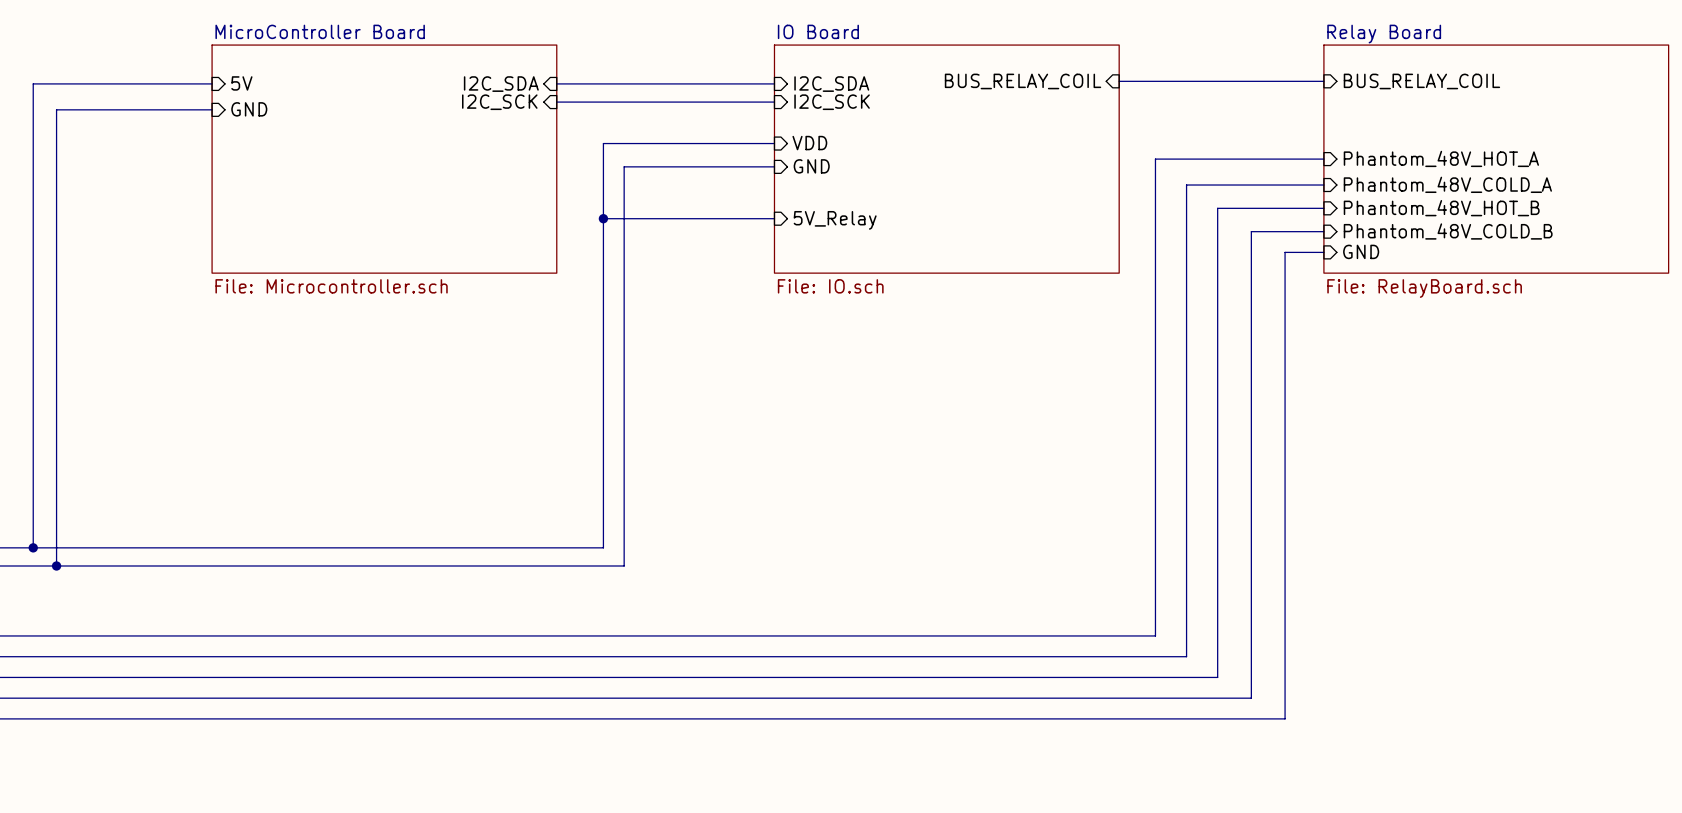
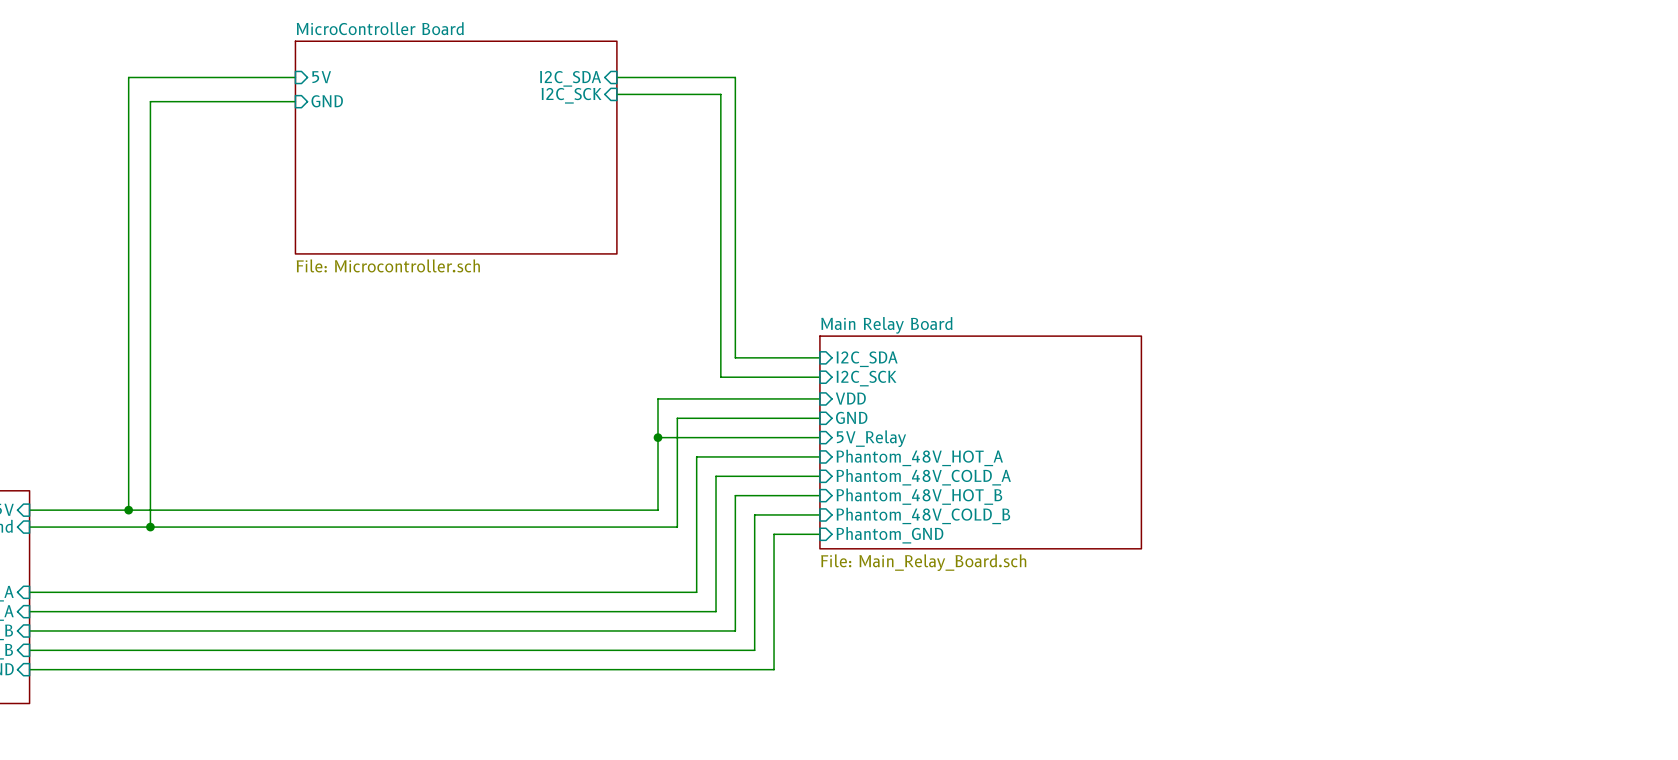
sheet pin: BUS_RELAY_COIL (1023, 81) -> none
bus: (1119, 81) (1323, 81) -> none
sheet pin: BUS_RELAY_COIL (1421, 81) -> none
wire: (683, 83) (774, 83) -> (735, 77) (735, 357) (819, 357)
sheet pin: I2C_SDA (831, 84) -> none
wire: (668, 102) (774, 102) -> (720, 94) (720, 377) (819, 377)
sheet pin: I2C_SCK (832, 102) -> none
wire: (774, 143) (603, 143) (603, 547) (600, 547) -> (819, 398) (658, 398) (658, 510)
sheet pin: VDD (809, 143) -> none
sheet pin: Phantom_48V_HOT_A (1441, 158) -> none
sheet IO Board: File: IO.sch (946, 159) -> none
wire: (1323, 159) (1155, 159) (1155, 635) (642, 635) -> (819, 456) (696, 456) (696, 592)
sheet Relay Board: File: RelayBoard.sch (1496, 159) -> none
wire: (774, 166) (624, 166) (624, 565) (621, 565) -> (819, 418) (677, 418) (677, 527)
sheet pin: GND (811, 166) -> none
sheet pin: Phantom_48V_COLD_A (1447, 184) -> none
wire: (1323, 185) (1186, 185) (1186, 656) (663, 656) -> (819, 476) (716, 476) (716, 611)
wire: (1323, 208) (1217, 208) (1217, 677) (683, 677) -> (819, 495) (735, 495) (735, 630)
sheet pin: Phantom_48V_HOT_B (1441, 208) -> none
wire: (603, 218) (774, 218) -> none
junction: (603, 218) -> none
sheet pin position: 5V_Relay (835, 220) -> 5V_Relay (871, 438)
wire: (1323, 231) (1251, 231) (1251, 698) (704, 698) -> (819, 514) (754, 514) (754, 650)
sheet pin: Phantom_48V_COLD_B (1448, 231) -> none
sheet pin: GND (1361, 251) -> none
wire: (1323, 252) (1285, 252) (1285, 718) (725, 718) -> (819, 534) (774, 534) (774, 669)
sheet pin: none -> I2C_SDA (867, 359)
sheet pin: none -> I2C_SCK (866, 378)
sheet pin: none -> VDD (850, 398)
sheet pin: none -> GND (851, 417)
wire: none -> (658, 437) (819, 437)
junction: none -> (658, 437)
sheet Main Relay Board: none -> File: Main_Relay_Board.sch (980, 442)
sheet pin: none -> Phantom_48V_HOT_A (919, 457)
sheet pin: none -> Phantom_48V_COLD_A (923, 477)
sheet pin: none -> Phantom_48V_HOT_B (919, 496)
sheet pin: none -> Phantom_48V_COLD_B (923, 515)
sheet pin: none -> Phantom_GND (889, 535)

